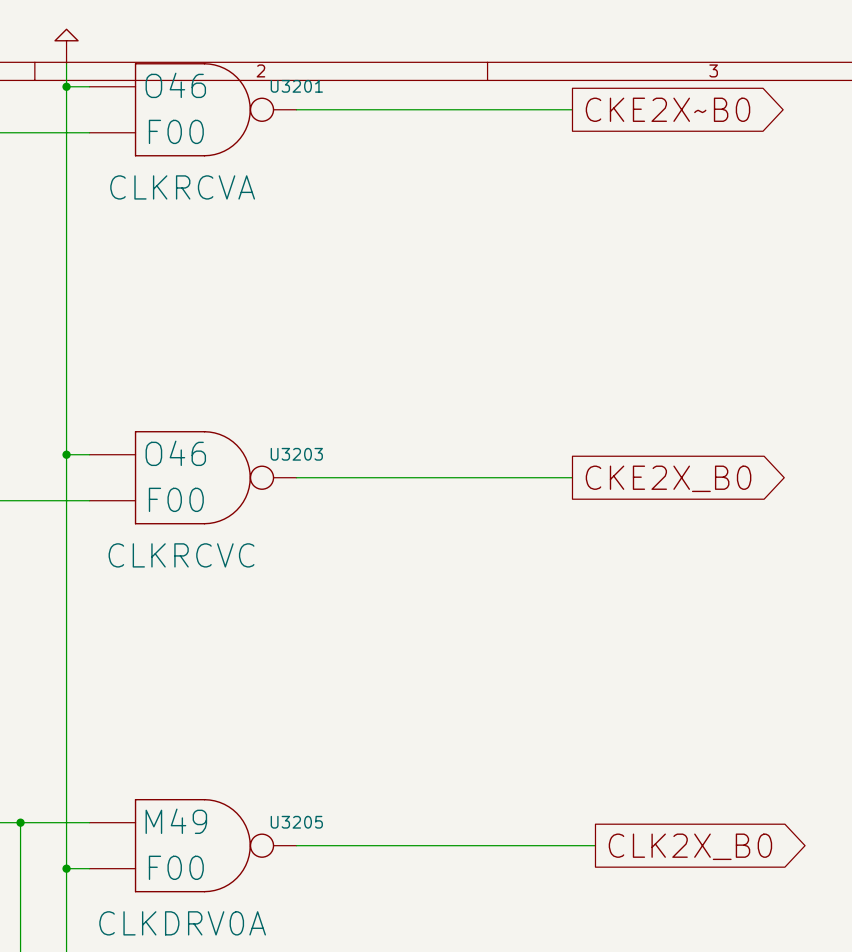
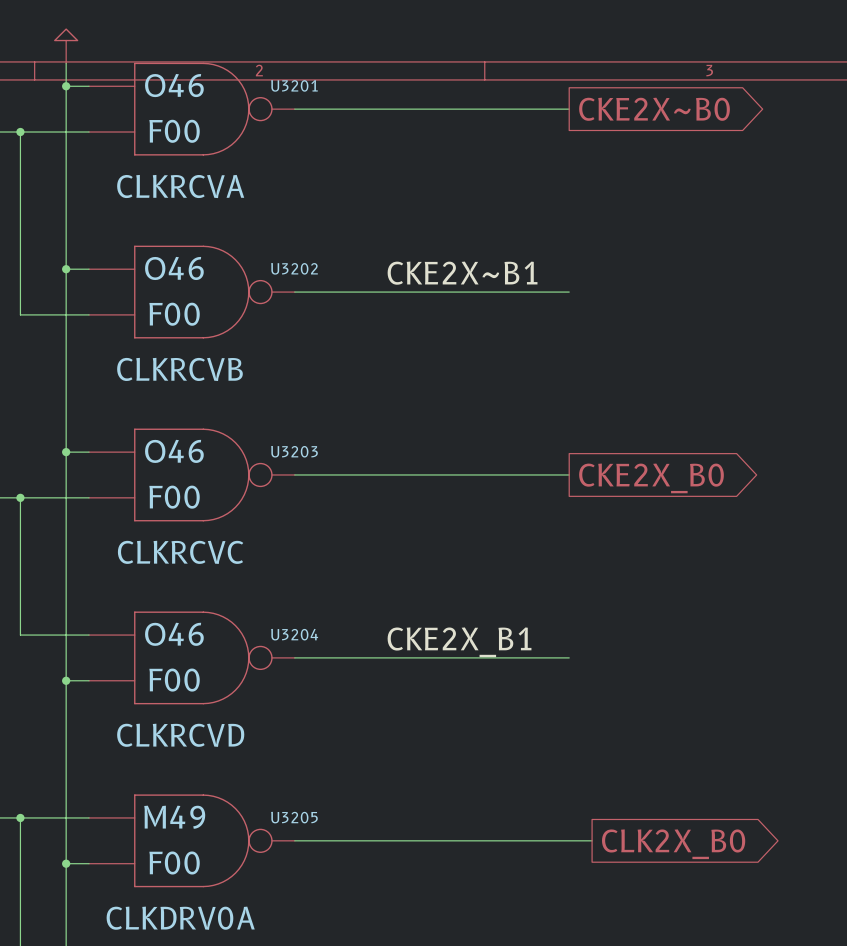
wire: none -> (20, 132) (20, 314) (89, 314)
junction: none -> (20, 132)
wire: none -> (66, 269) (89, 269)
junction: none -> (66, 269)
label: none -> CKE2X~B1 (462, 273)
U3202: none -> F00 (191, 292)
wire: none -> (294, 292) (569, 292)
wire: none -> (20, 497) (20, 635) (89, 635)
junction: none -> (20, 497)
label: none -> CKE2X_B1 (459, 642)
U3204: none -> F00 (191, 657)
wire: none -> (294, 657) (569, 657)
wire: none -> (66, 680) (89, 680)
junction: none -> (66, 680)

